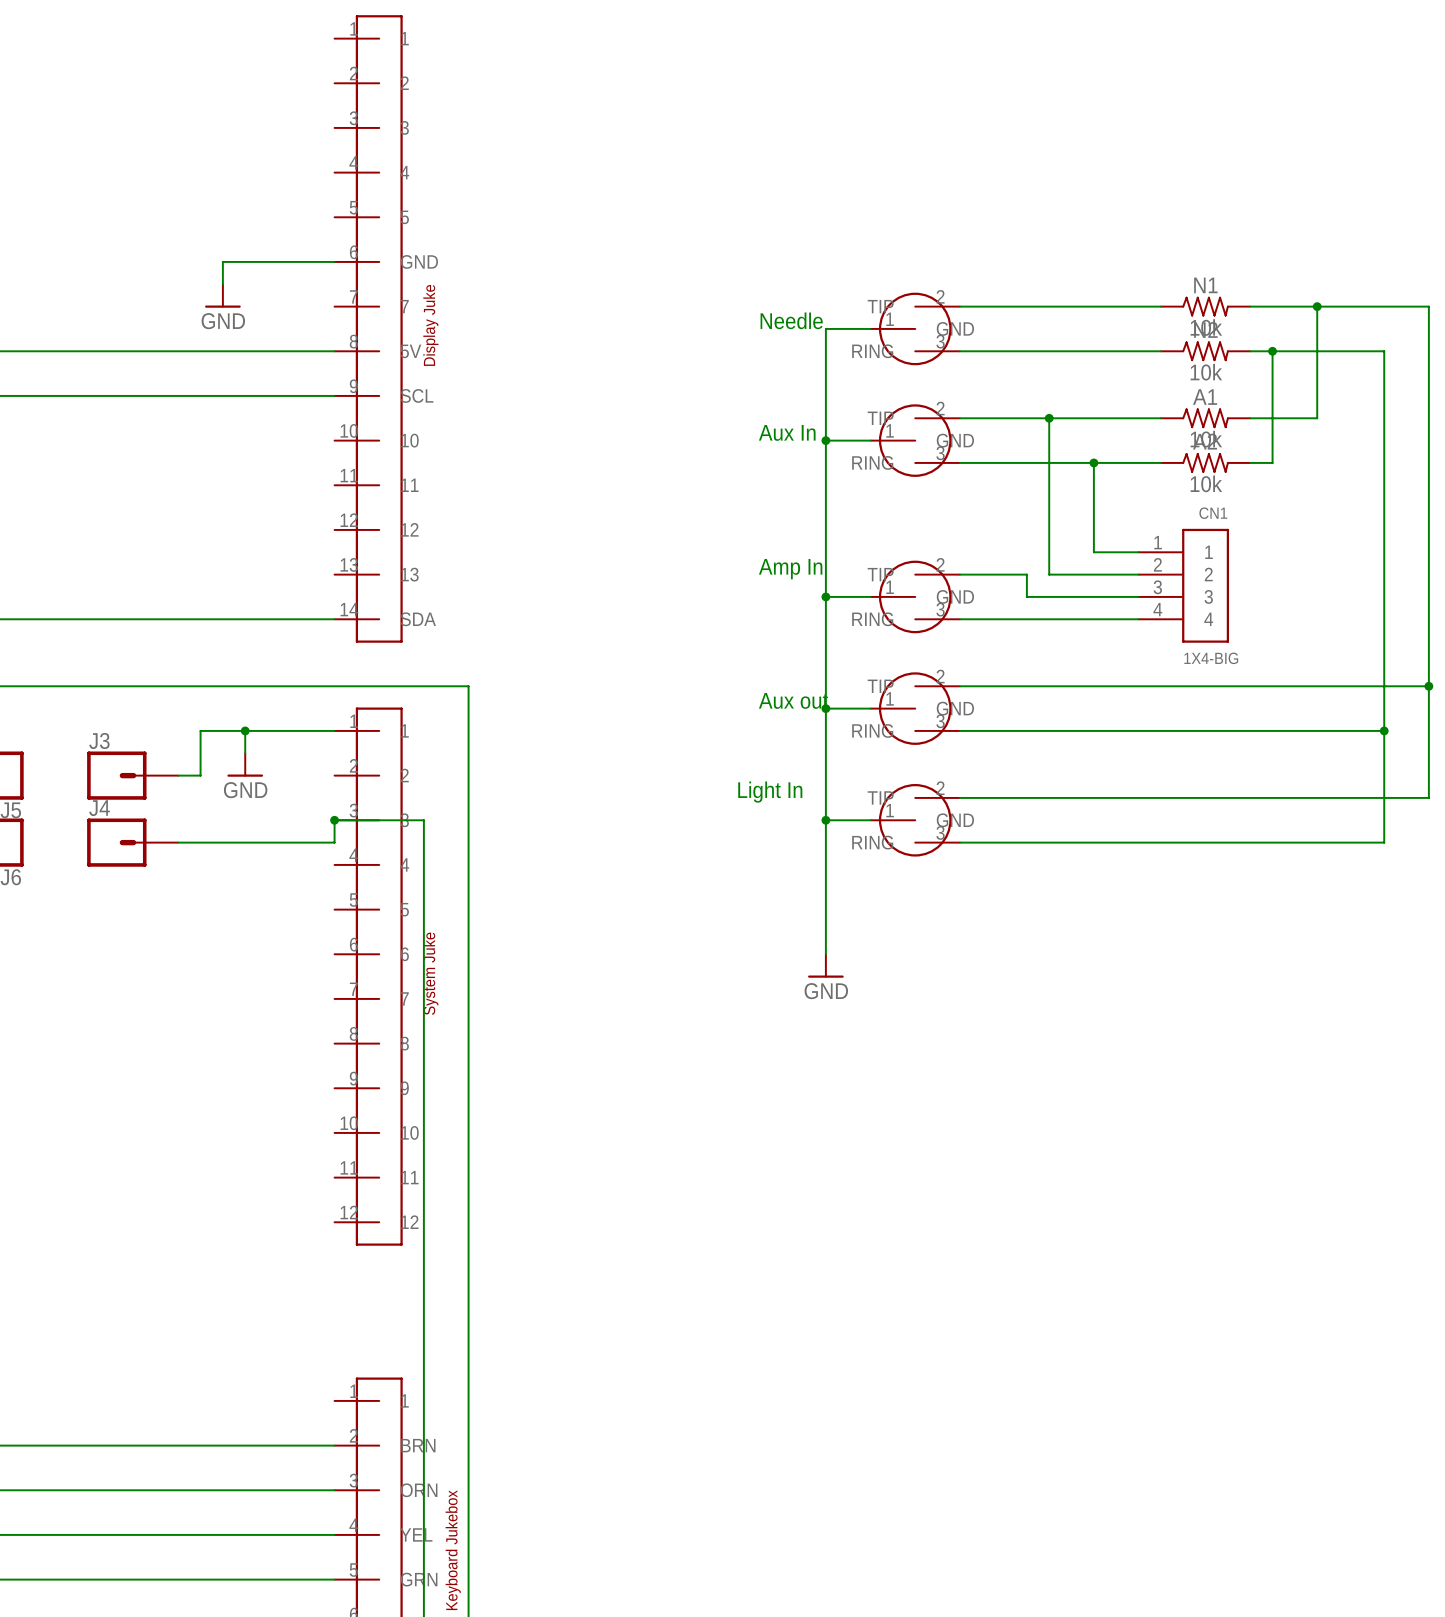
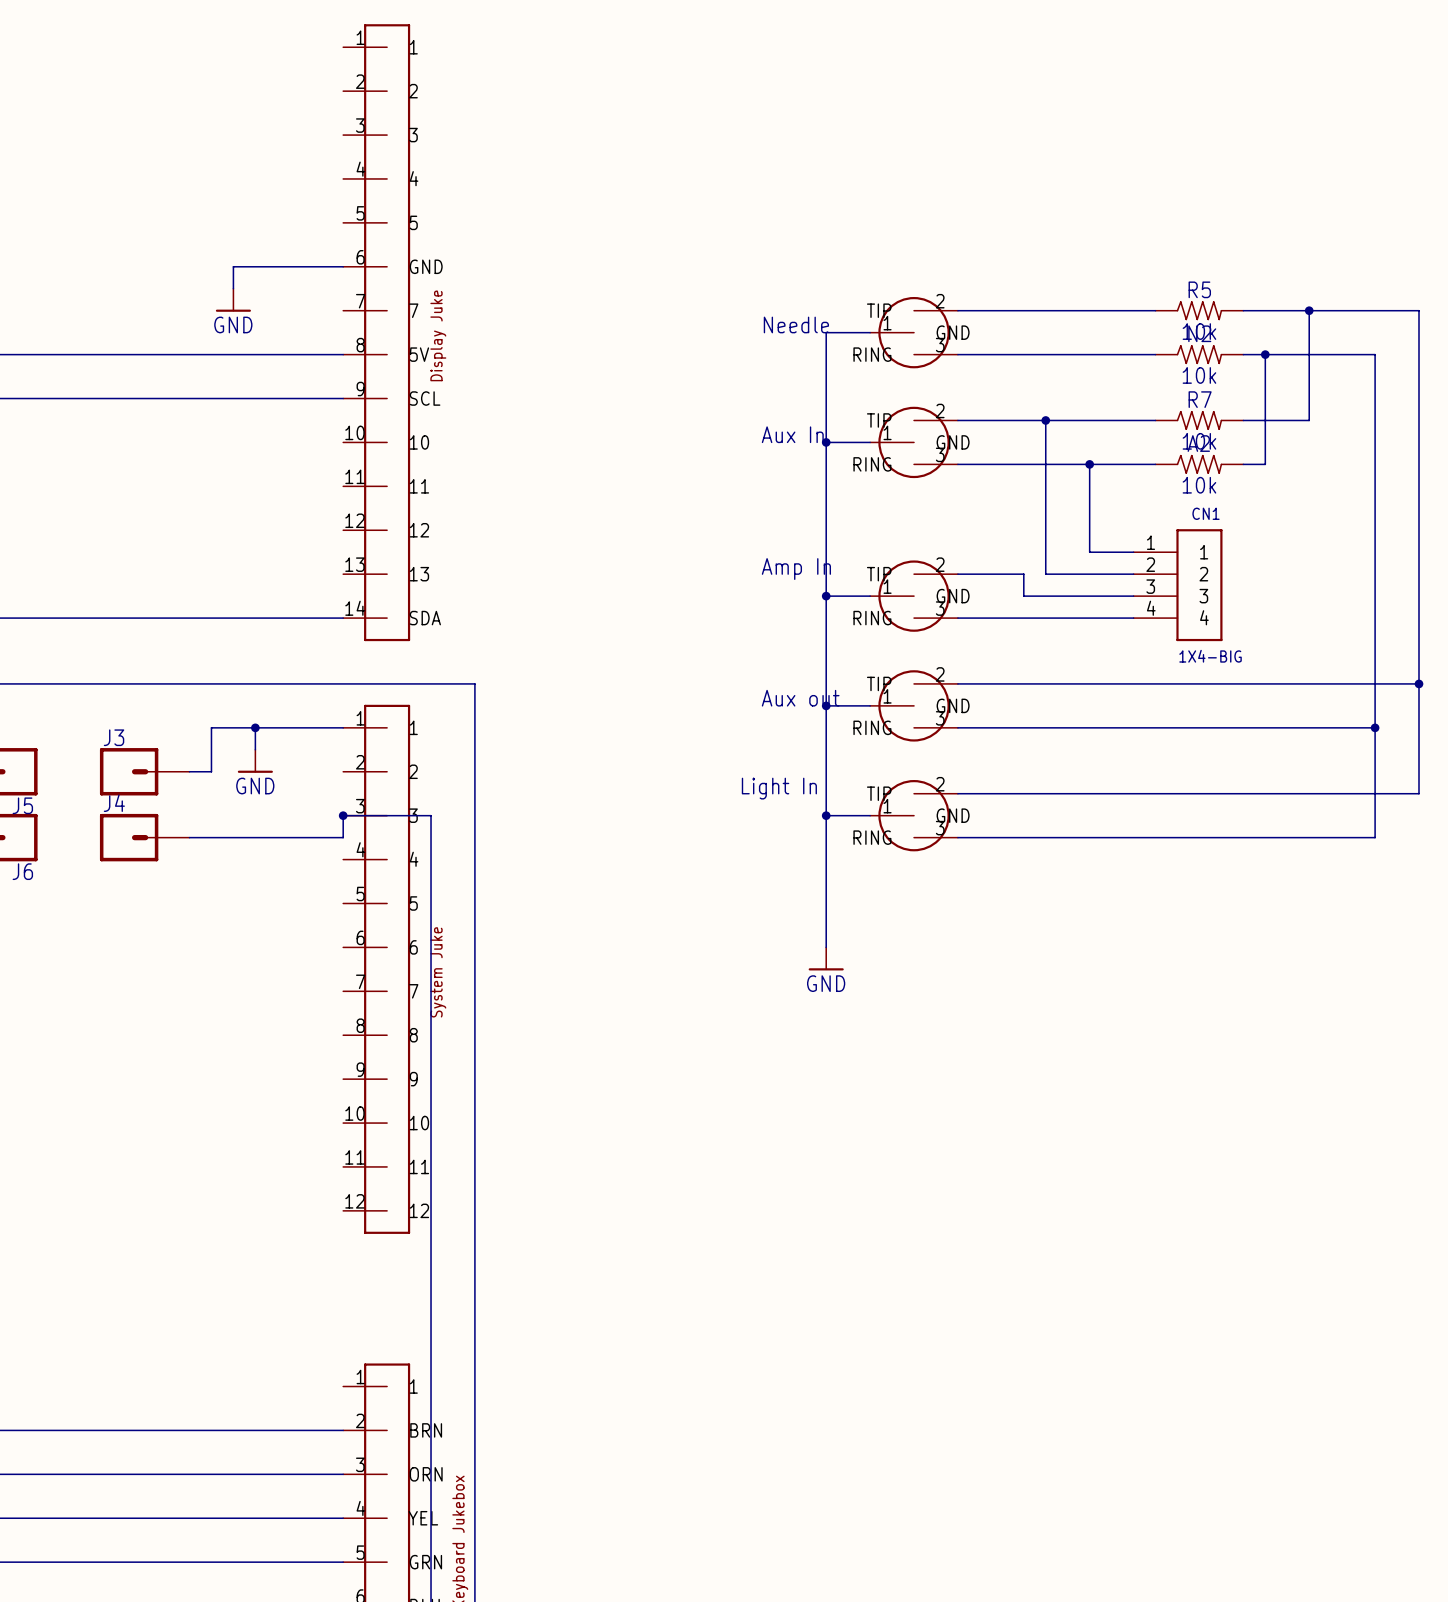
N1 name: N1 (1205, 285) -> R5 (1199, 289)
A1 name: A1 (1205, 397) -> R7 (1200, 399)

